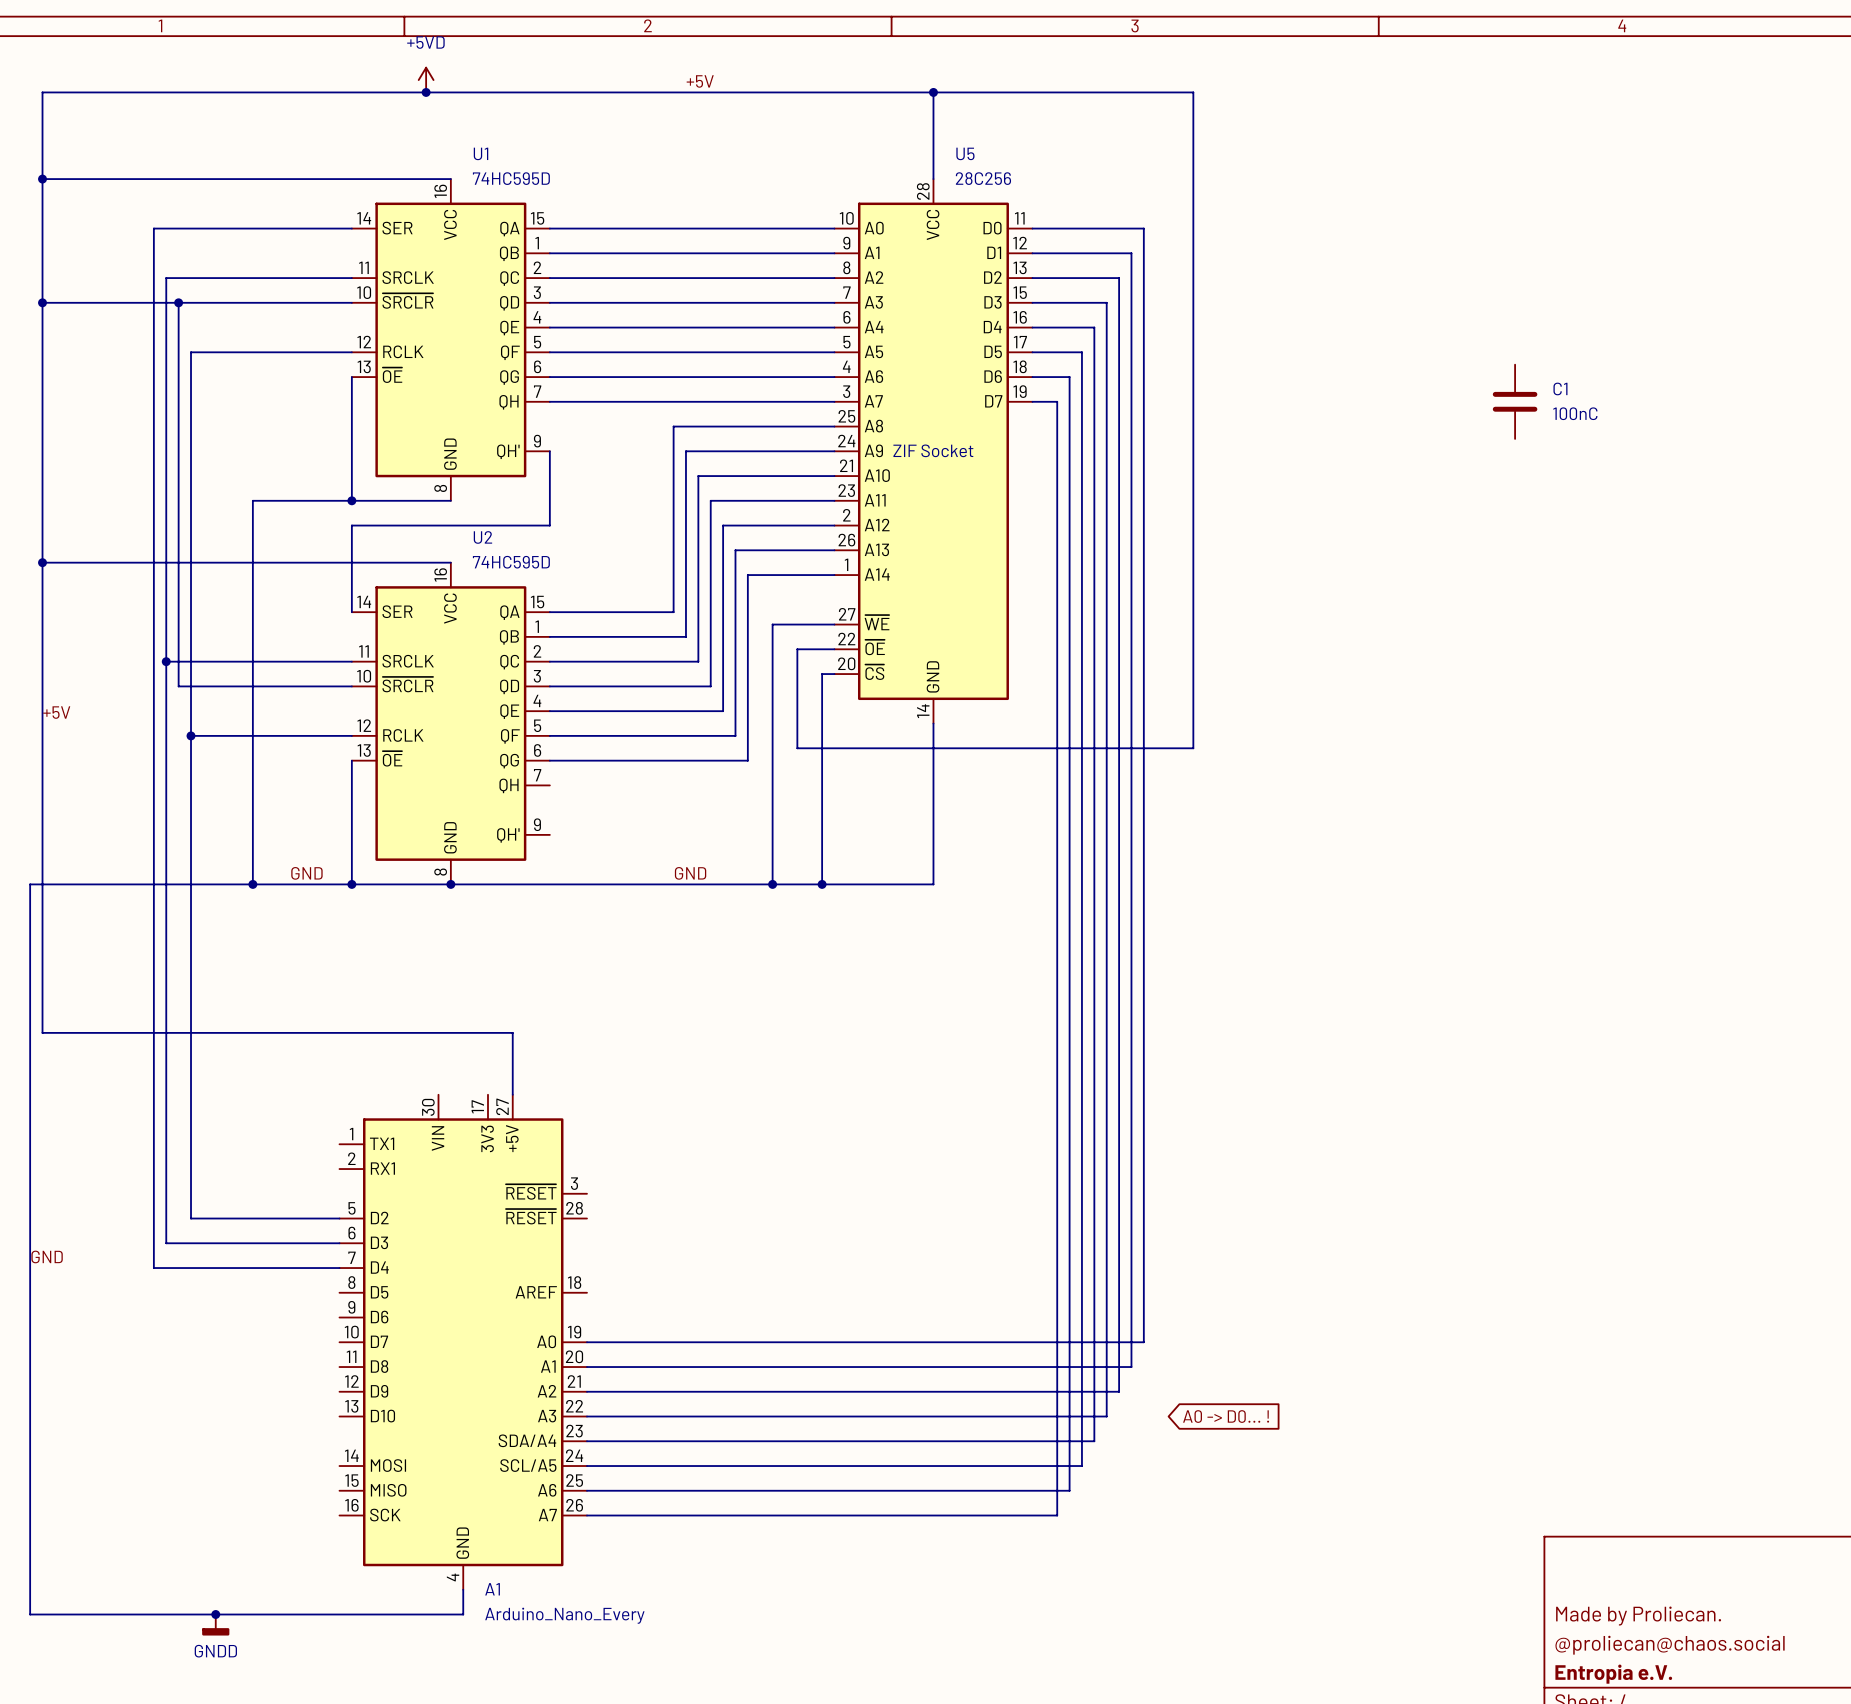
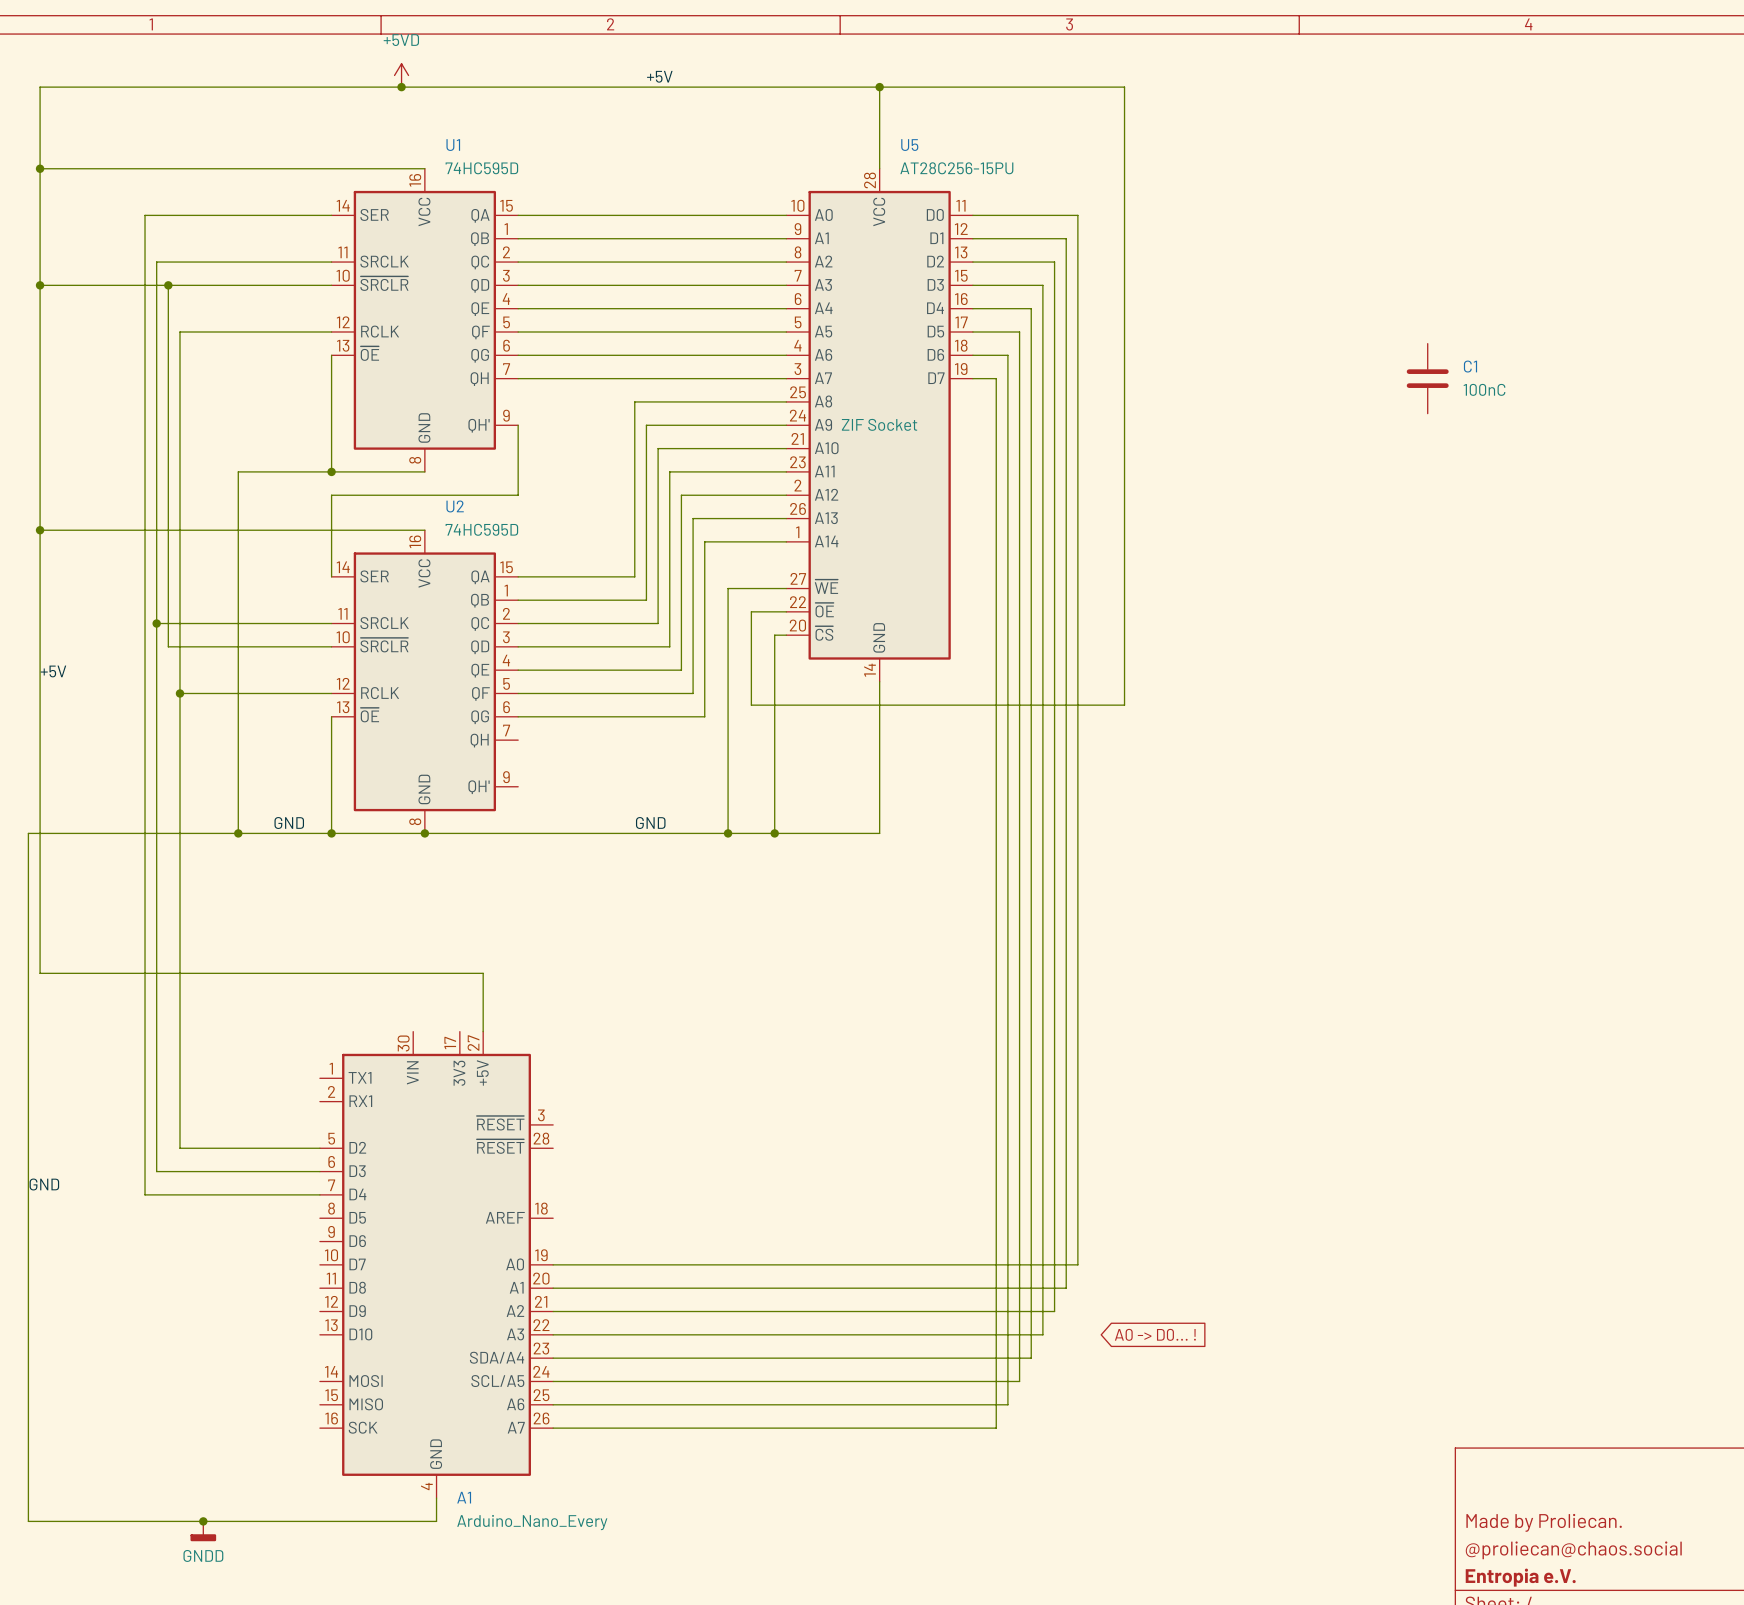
U5 value: 28C256 (983, 178) -> AT28C256-15PU (956, 168)

